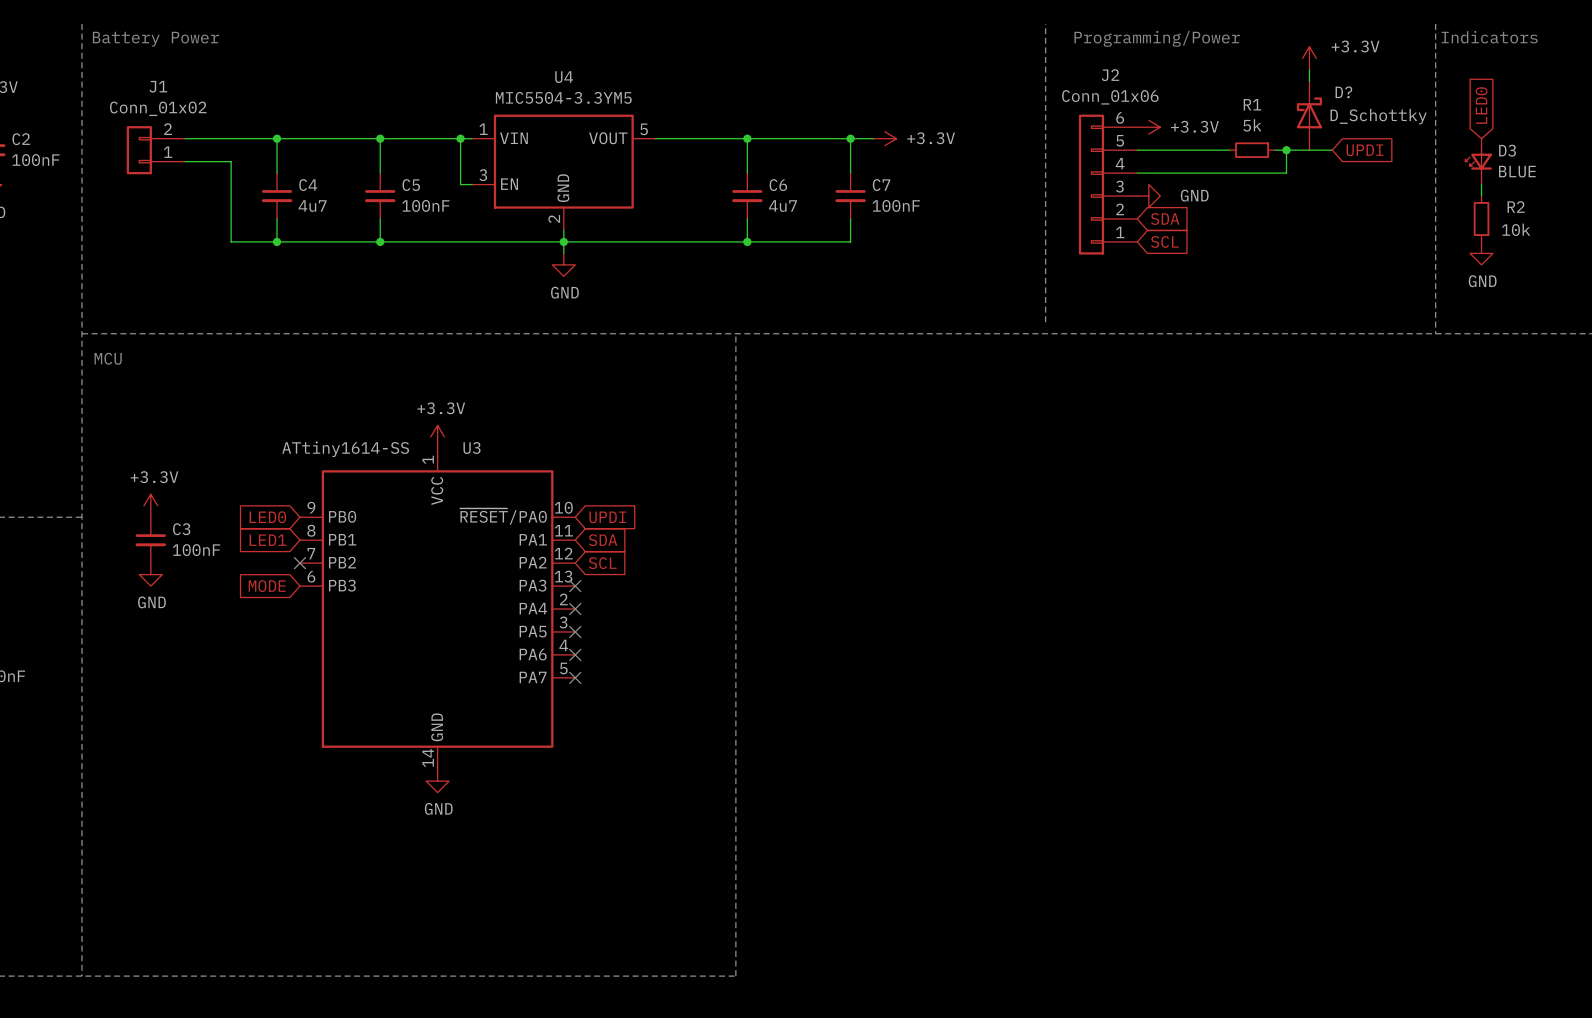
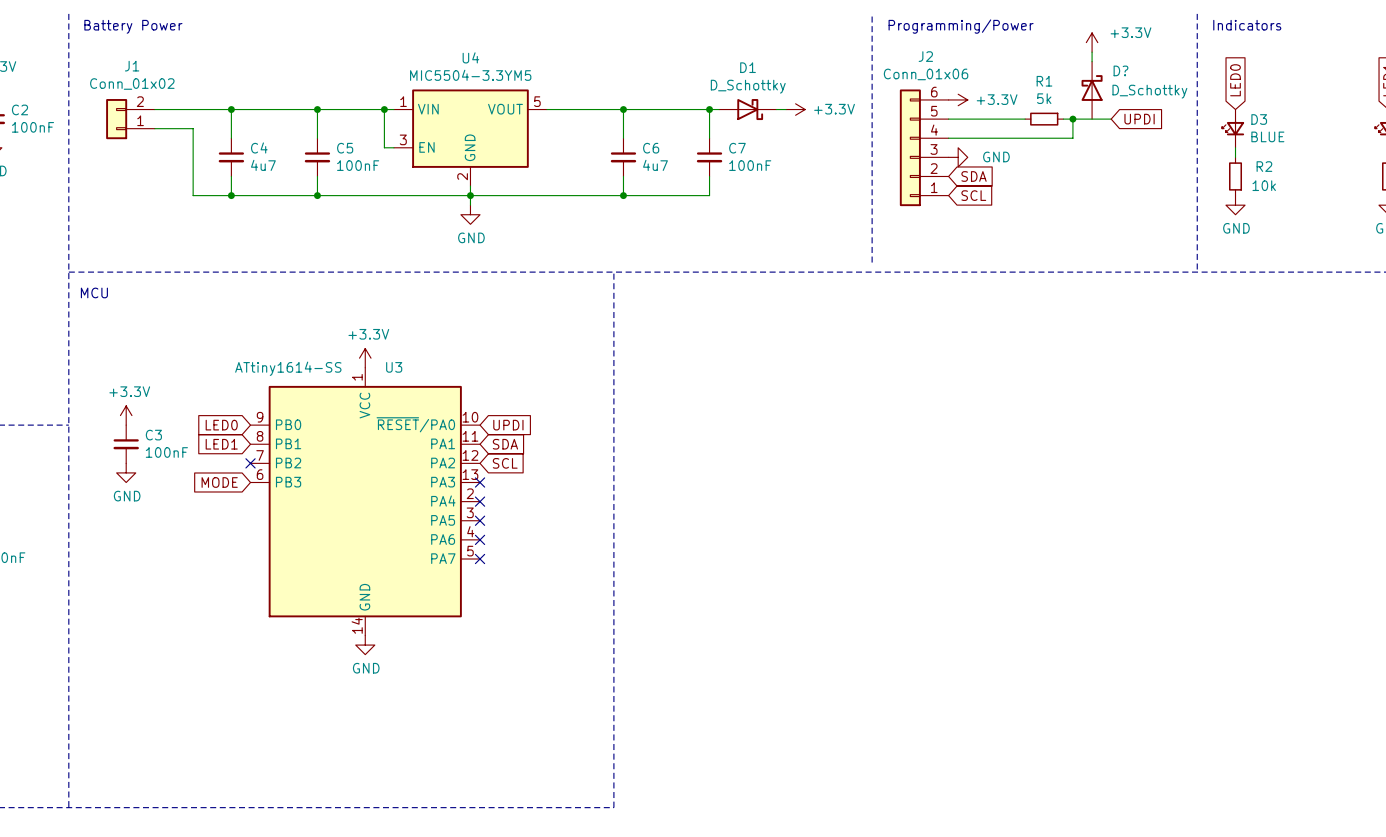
power symbol position: +3.3V (885, 138) -> +3.3V (795, 109)
D1: none -> D_Schottky (747, 109)

